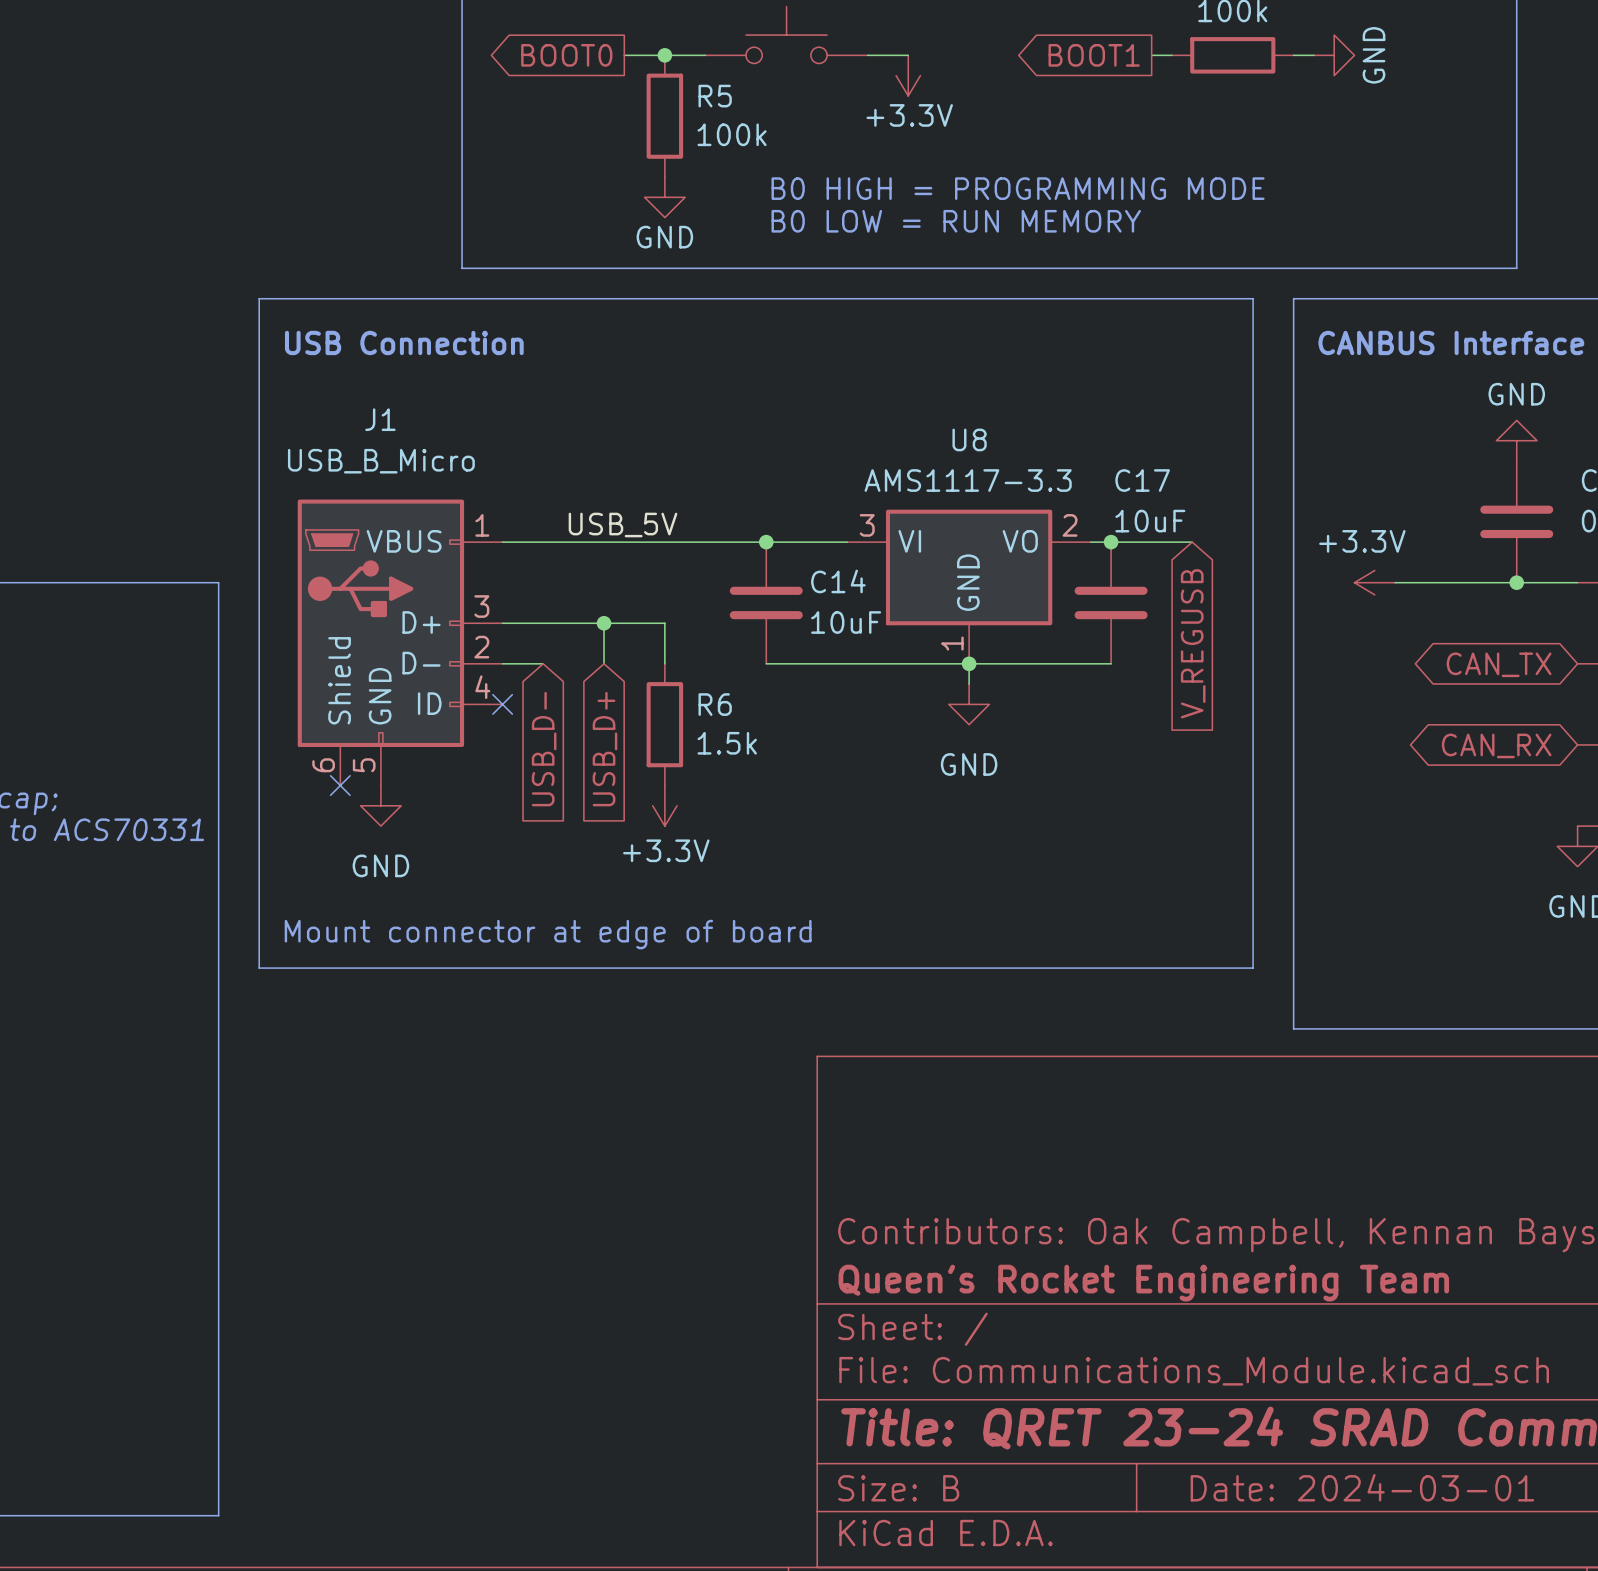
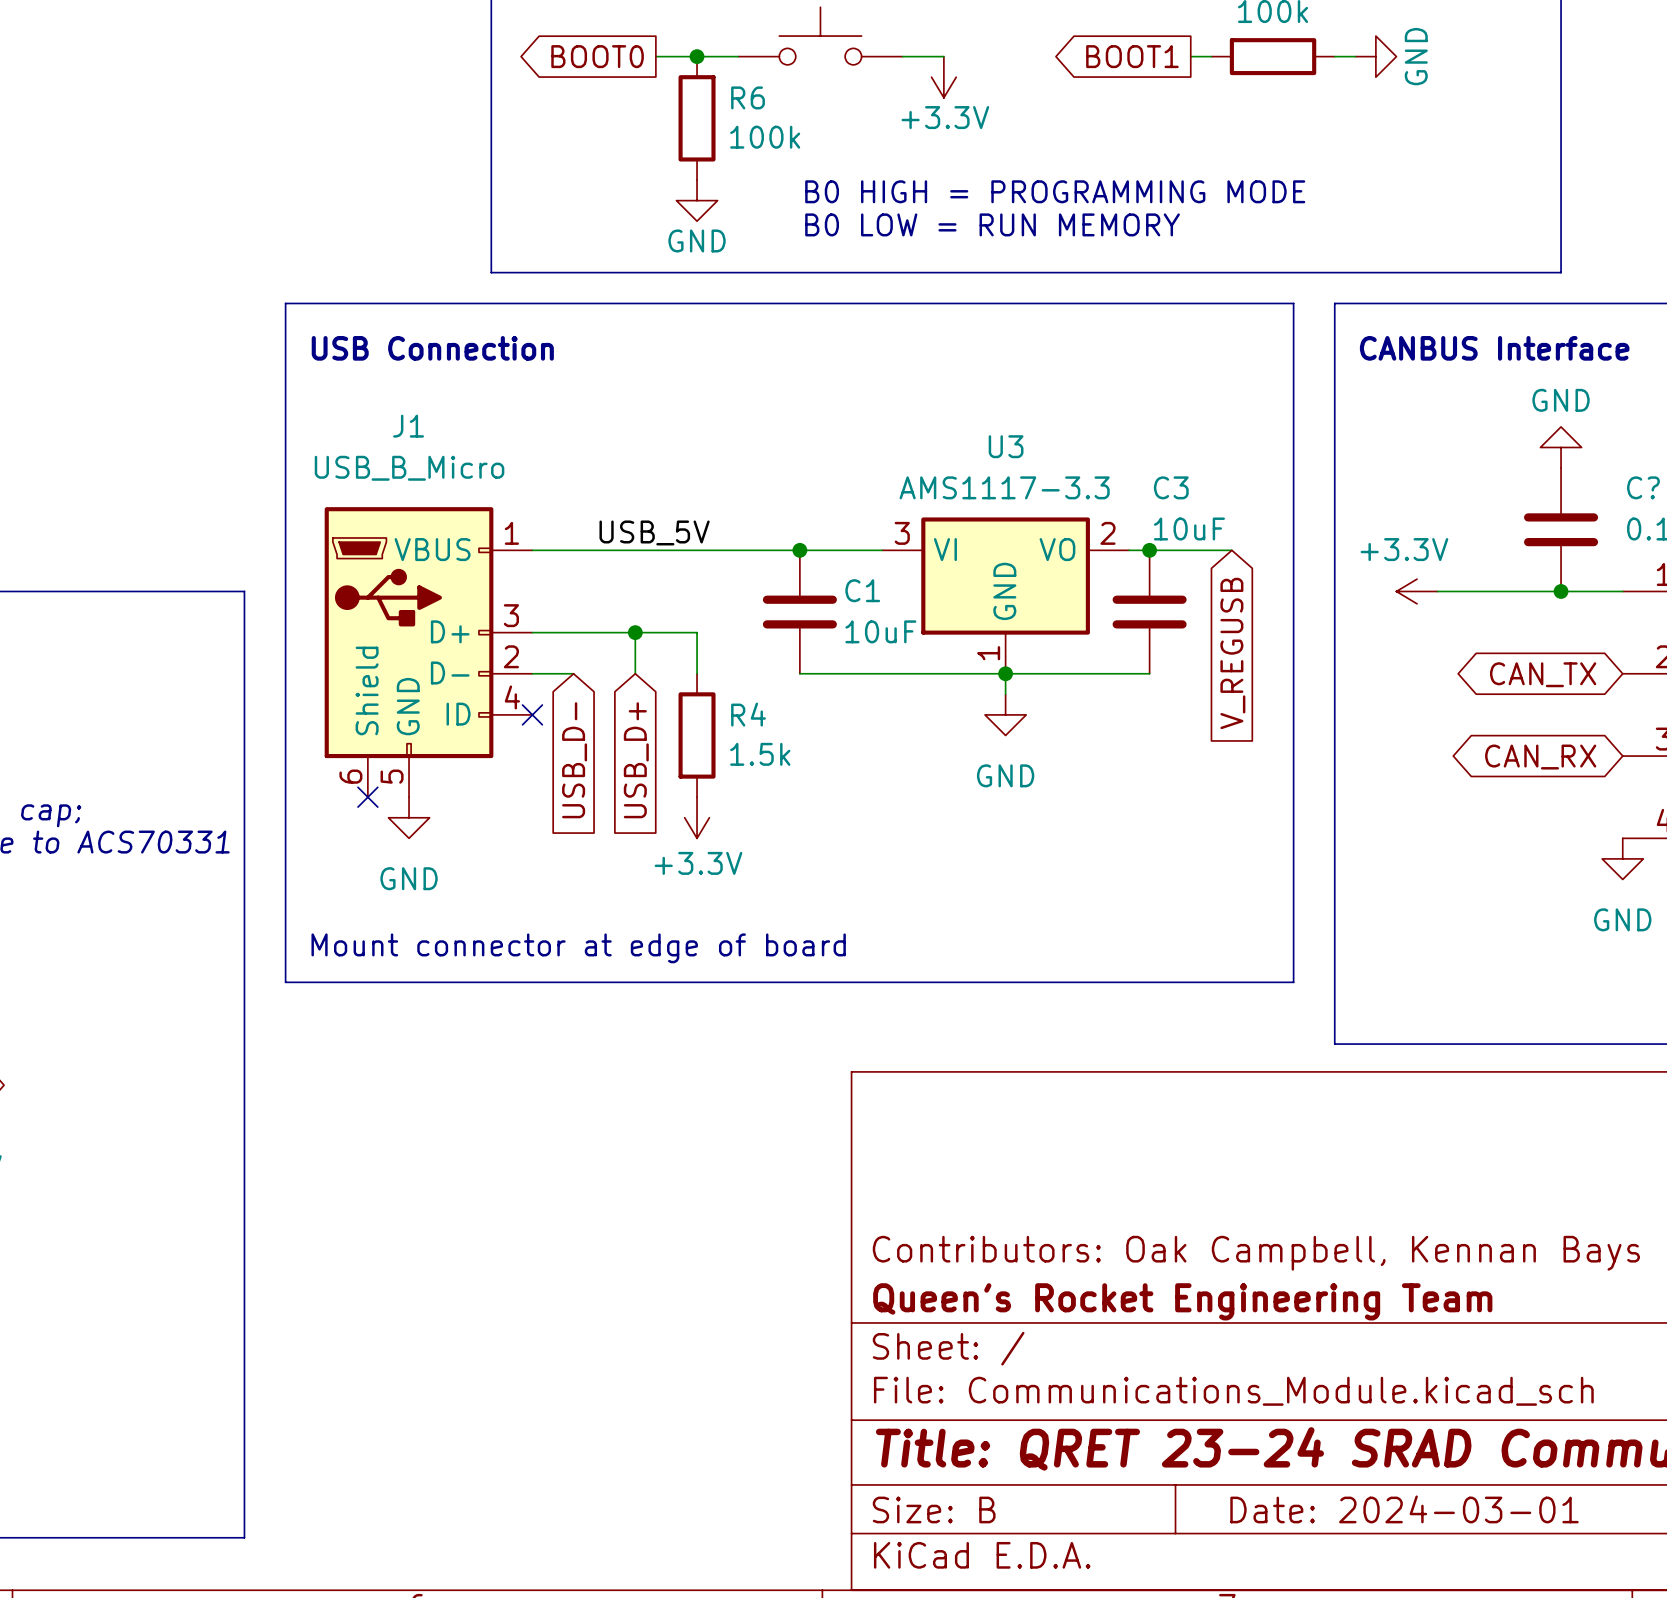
R5 name: R5 (715, 96) -> R6 (748, 97)
U8 name: U8 (969, 439) -> U3 (1006, 446)
C17 name: C17 (1142, 480) -> C3 (1171, 487)
C14 name: C14 (838, 581) -> C1 (862, 590)
R6 name: R6 (715, 704) -> R4 (748, 714)

